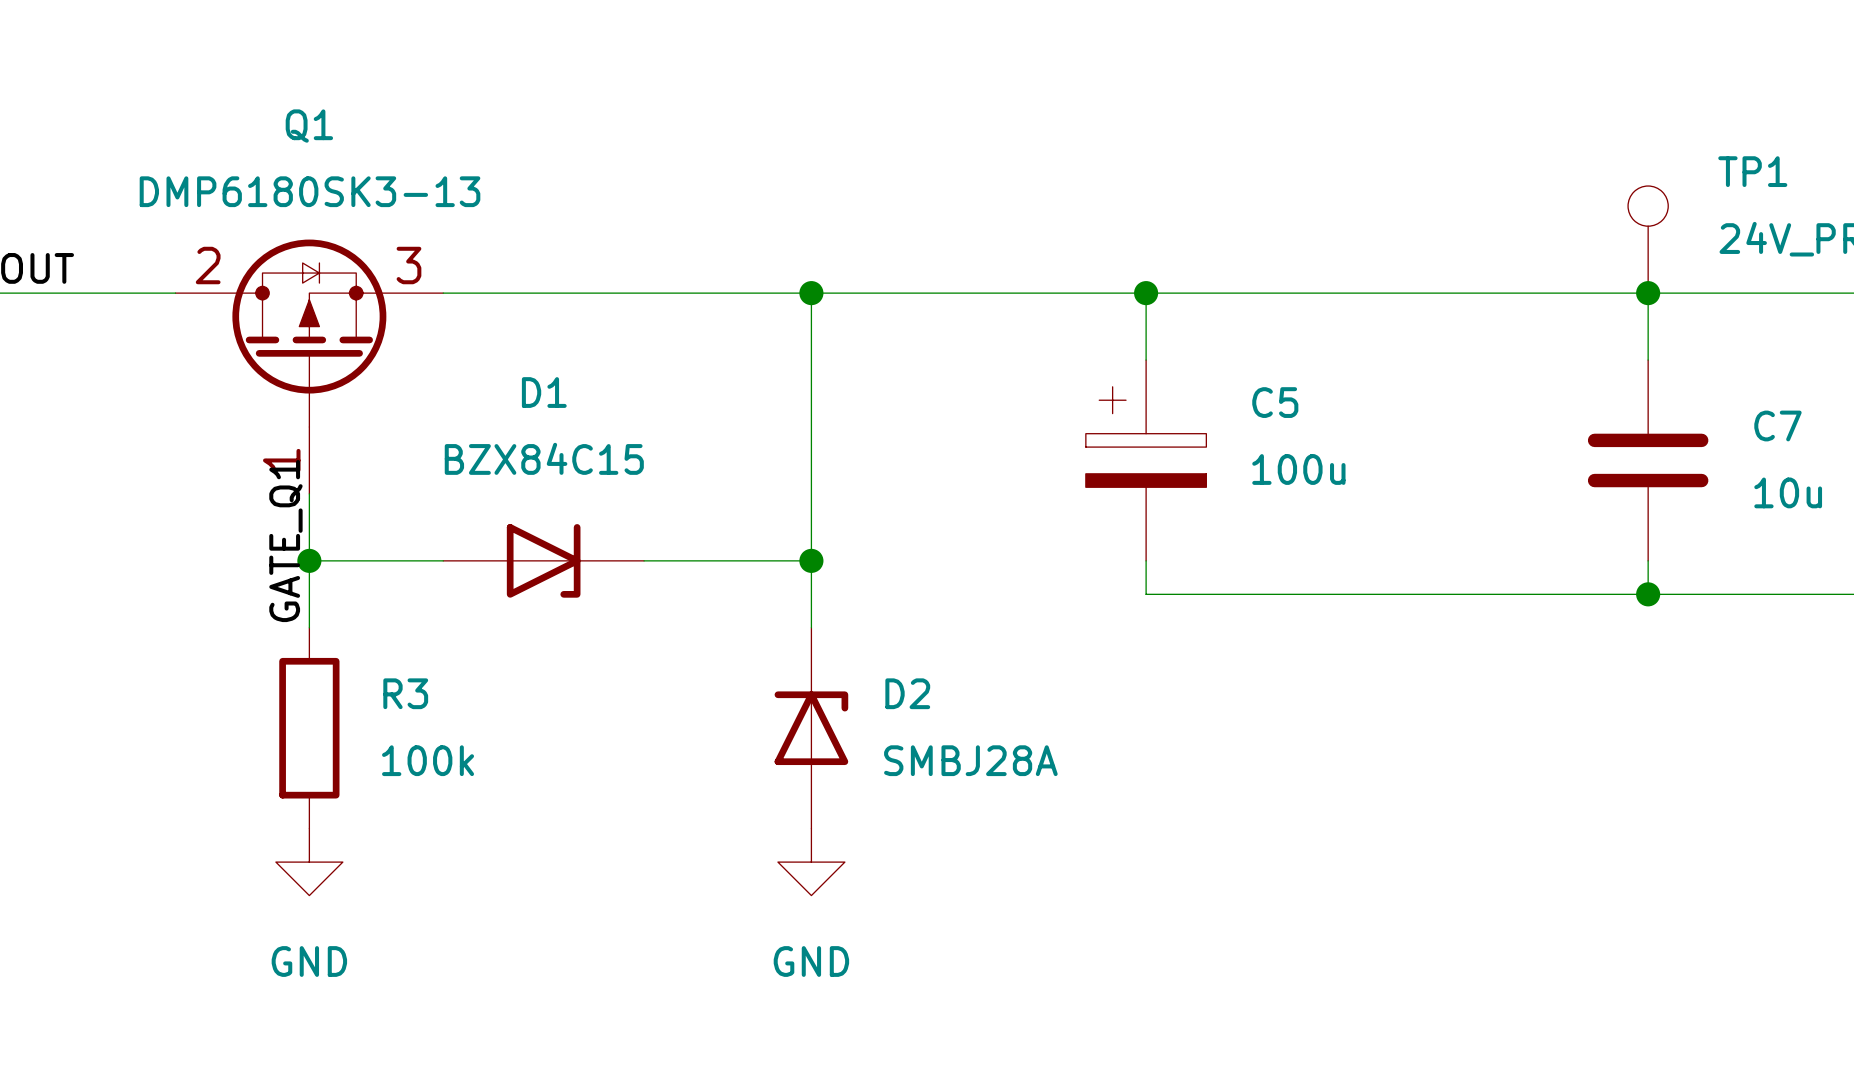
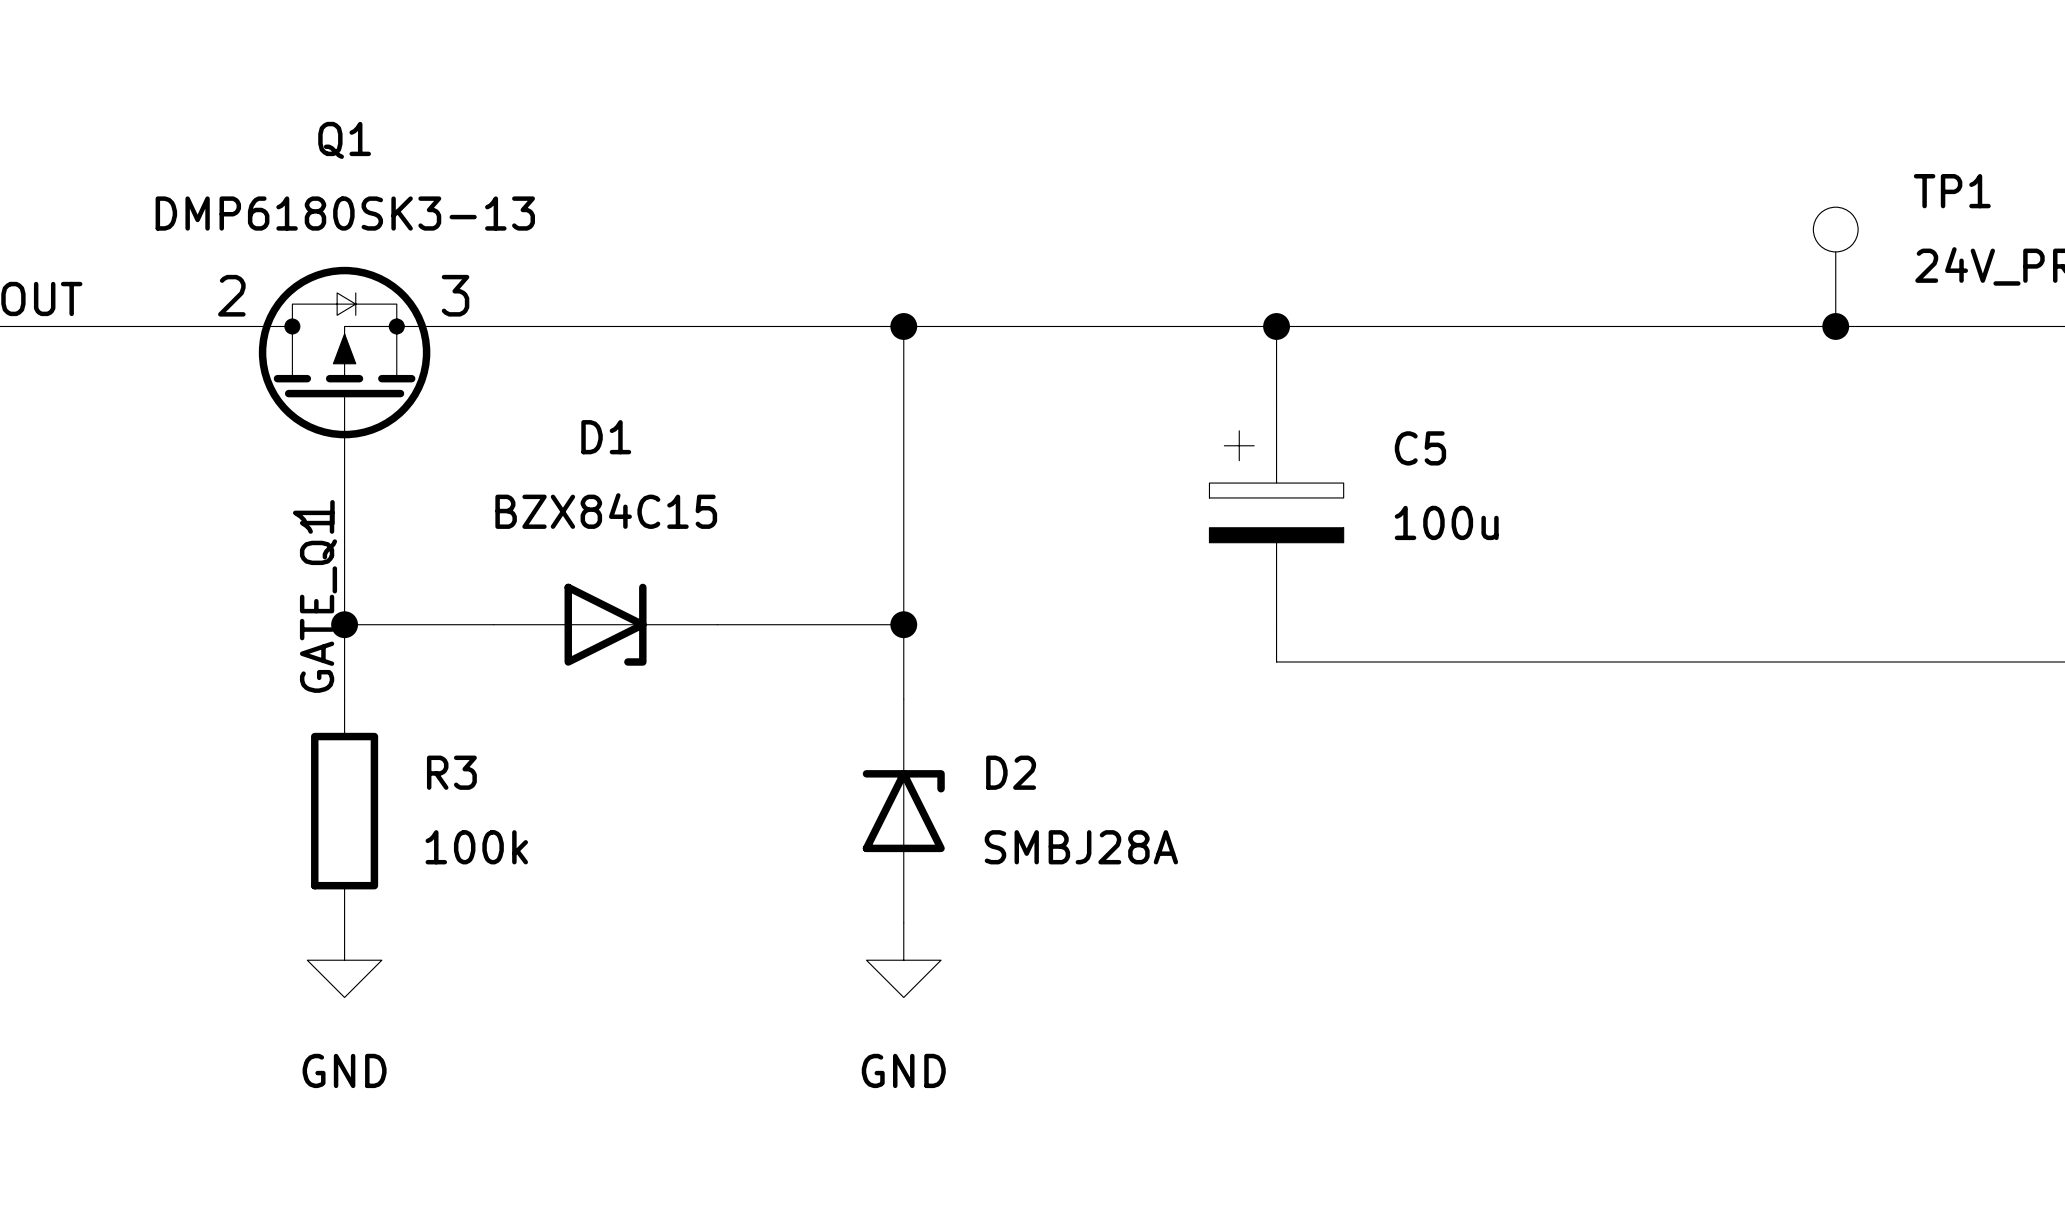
wire: (1648, 293) (1648, 360) -> none
C7: 10u (1648, 460) -> none
wire: (1648, 560) (1648, 594) -> none
junction: (1648, 594) -> none

